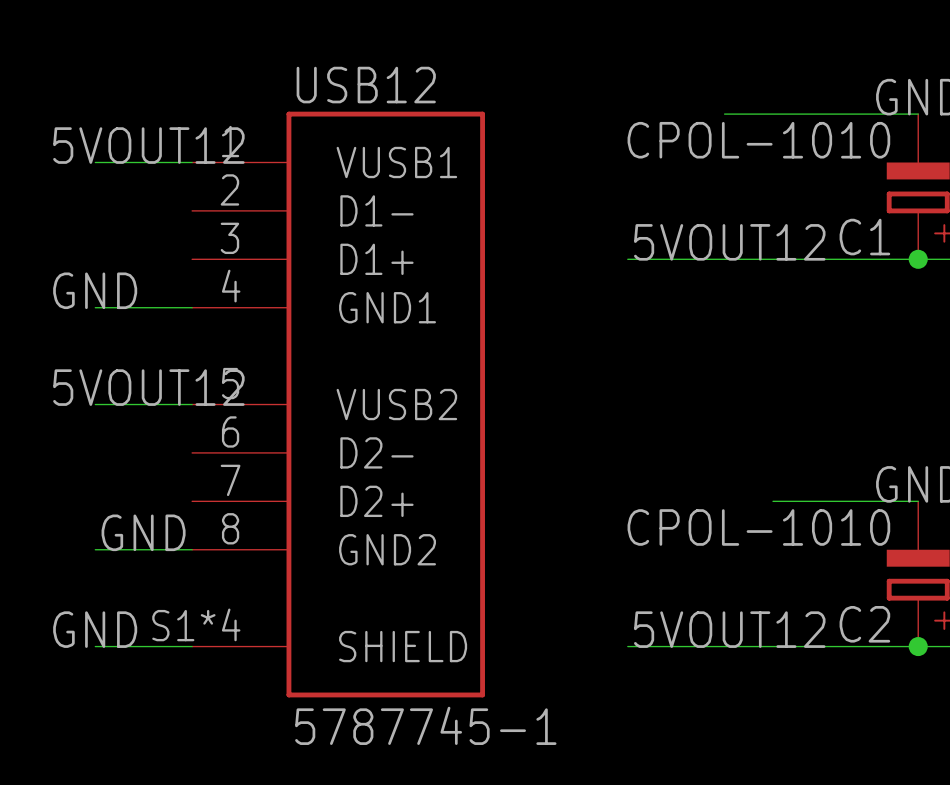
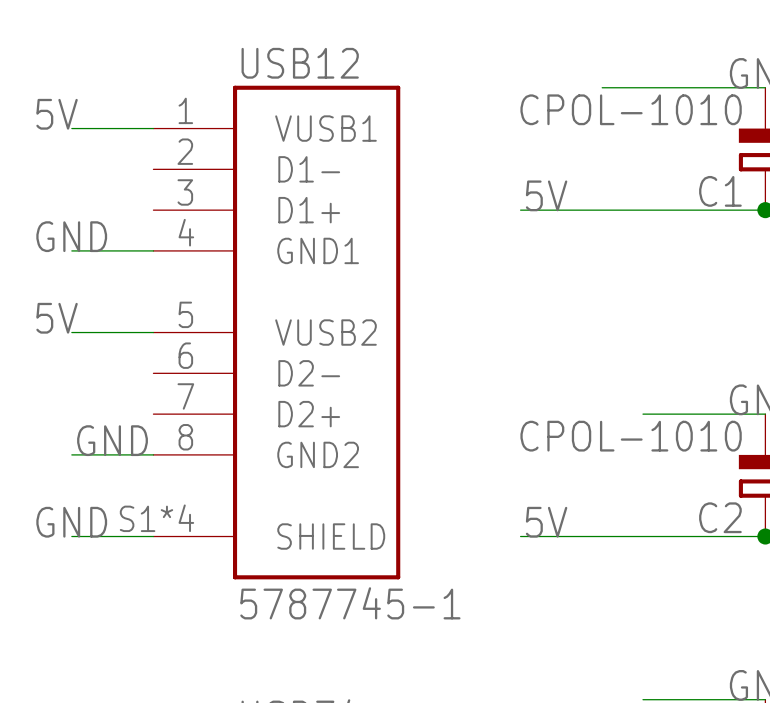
label: 5VOUT12 (148, 145) -> 5V (57, 114)
label: 5VOUT12 (729, 242) -> 5V (546, 195)
label: 5VOUT12 (148, 387) -> 5V (57, 318)
label: 5VOUT12 (729, 629) -> 5V (546, 522)

